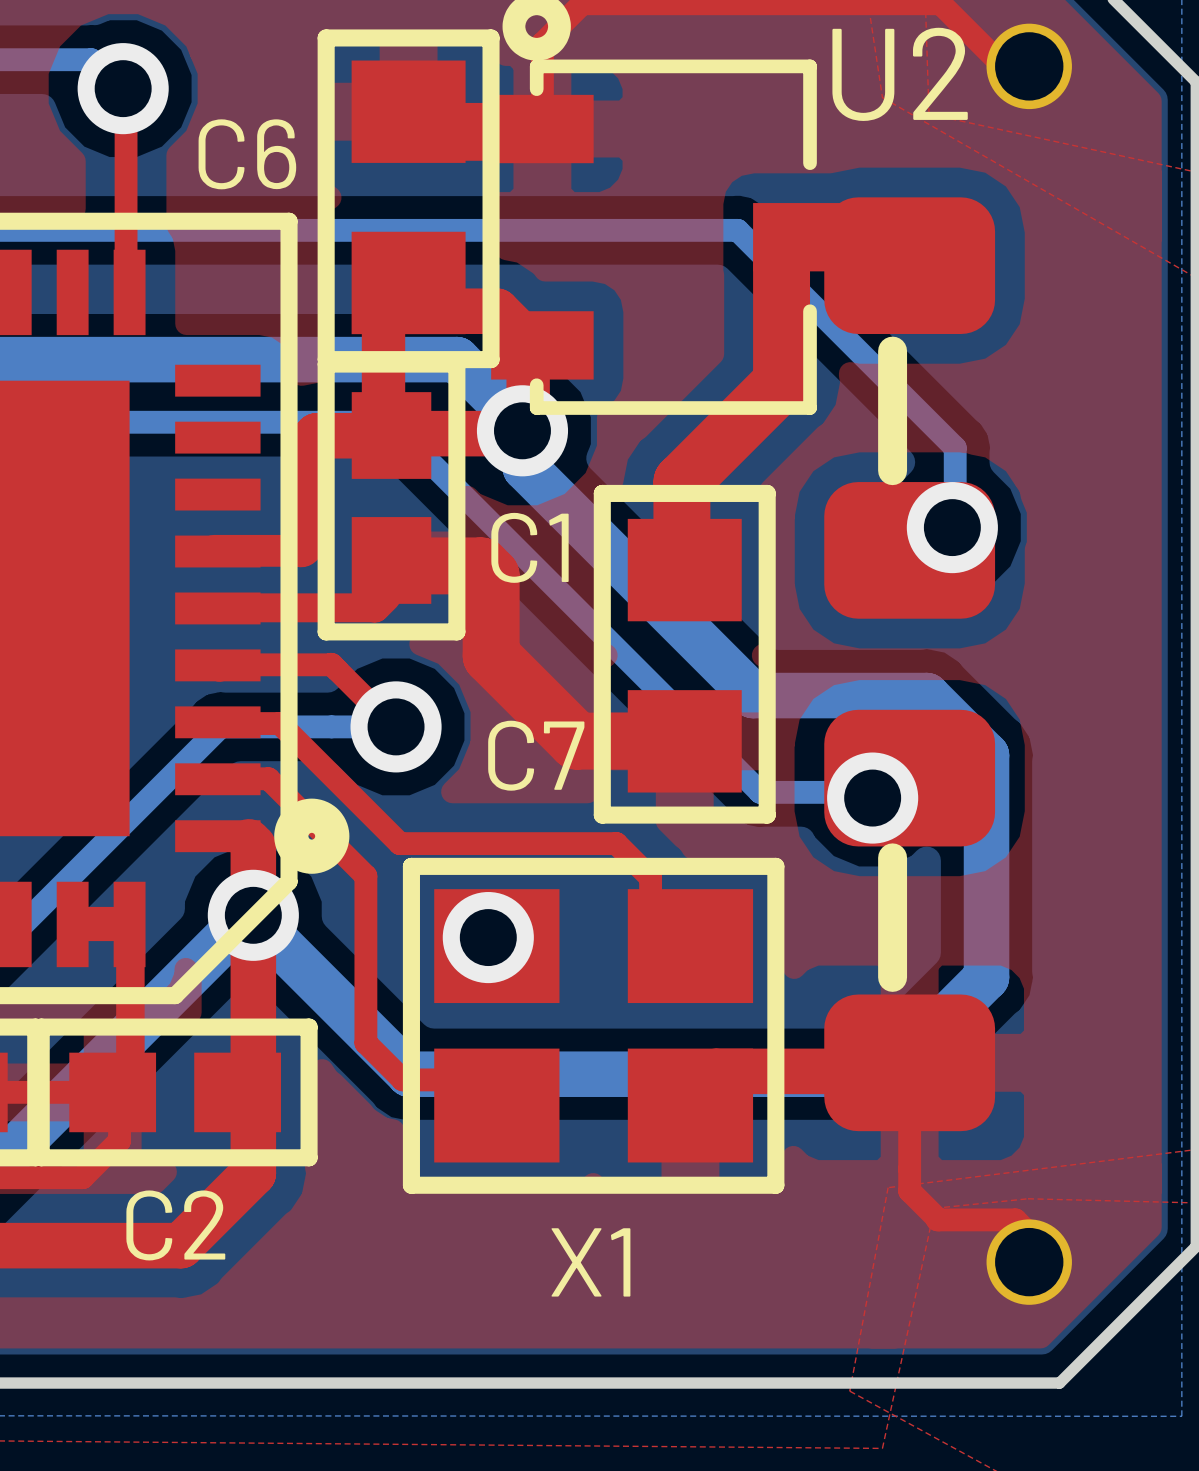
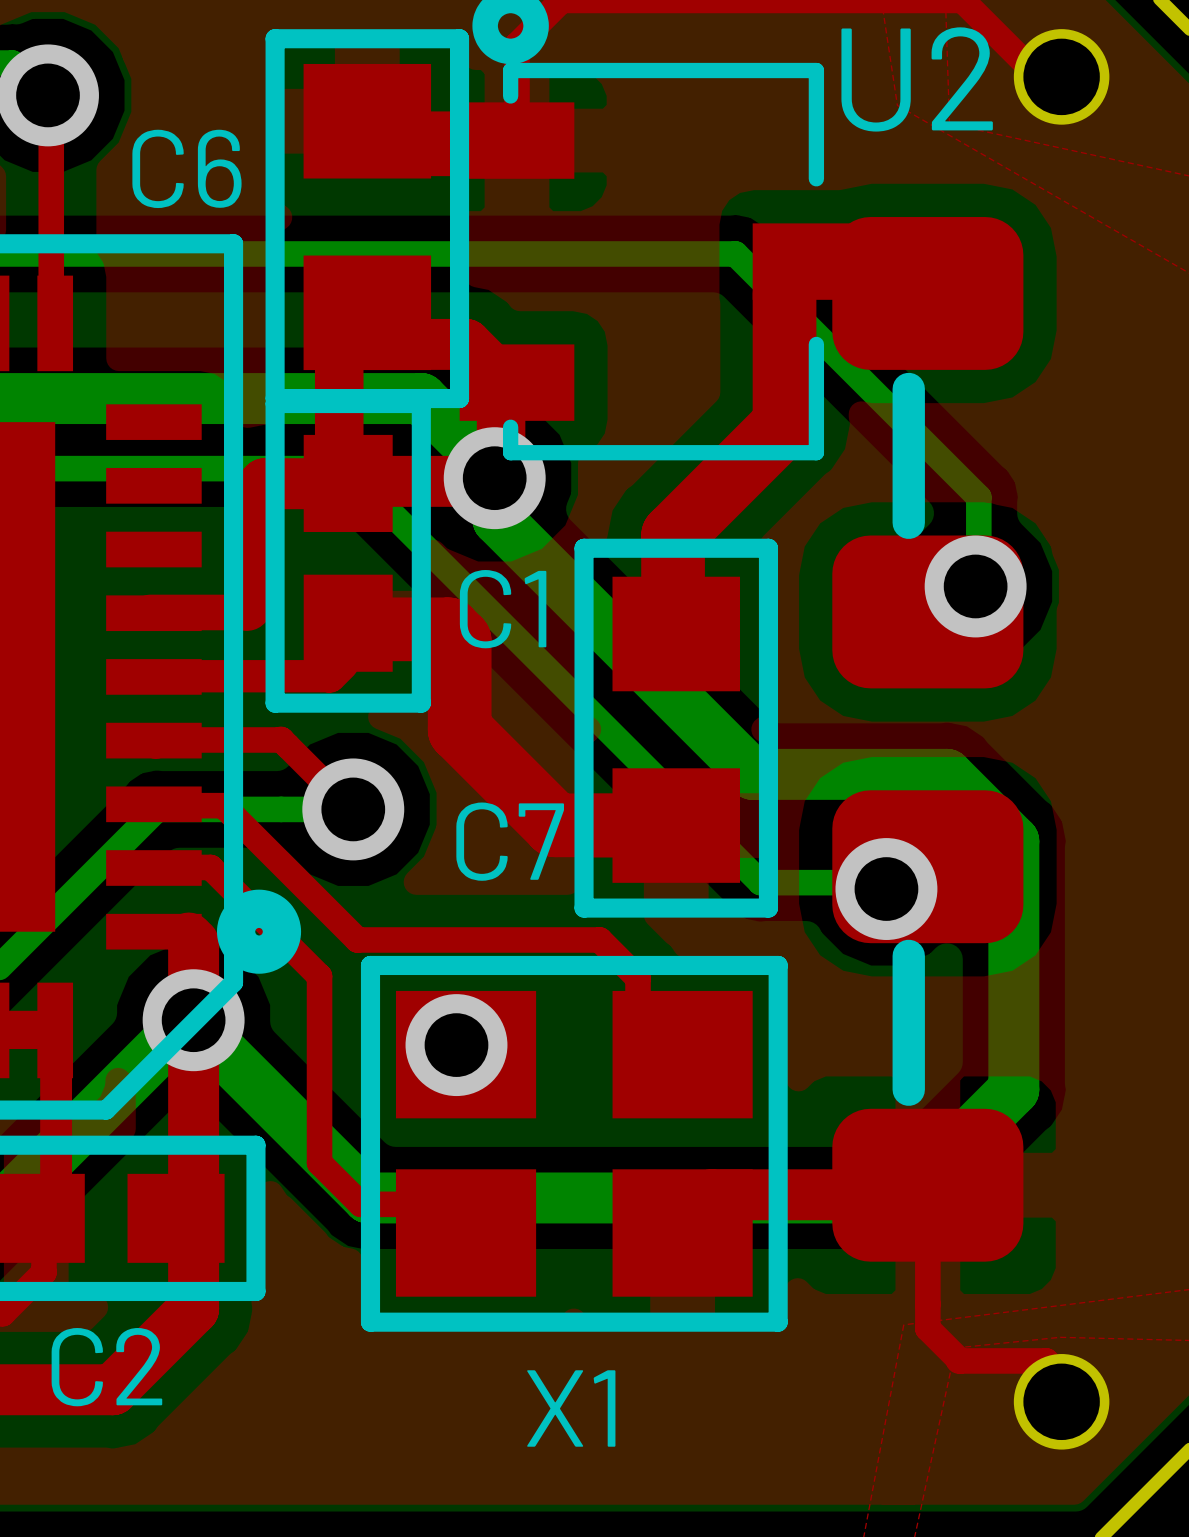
part footprint: [824, 23, 1072, 1305] -> [832, 29, 1110, 1450]

